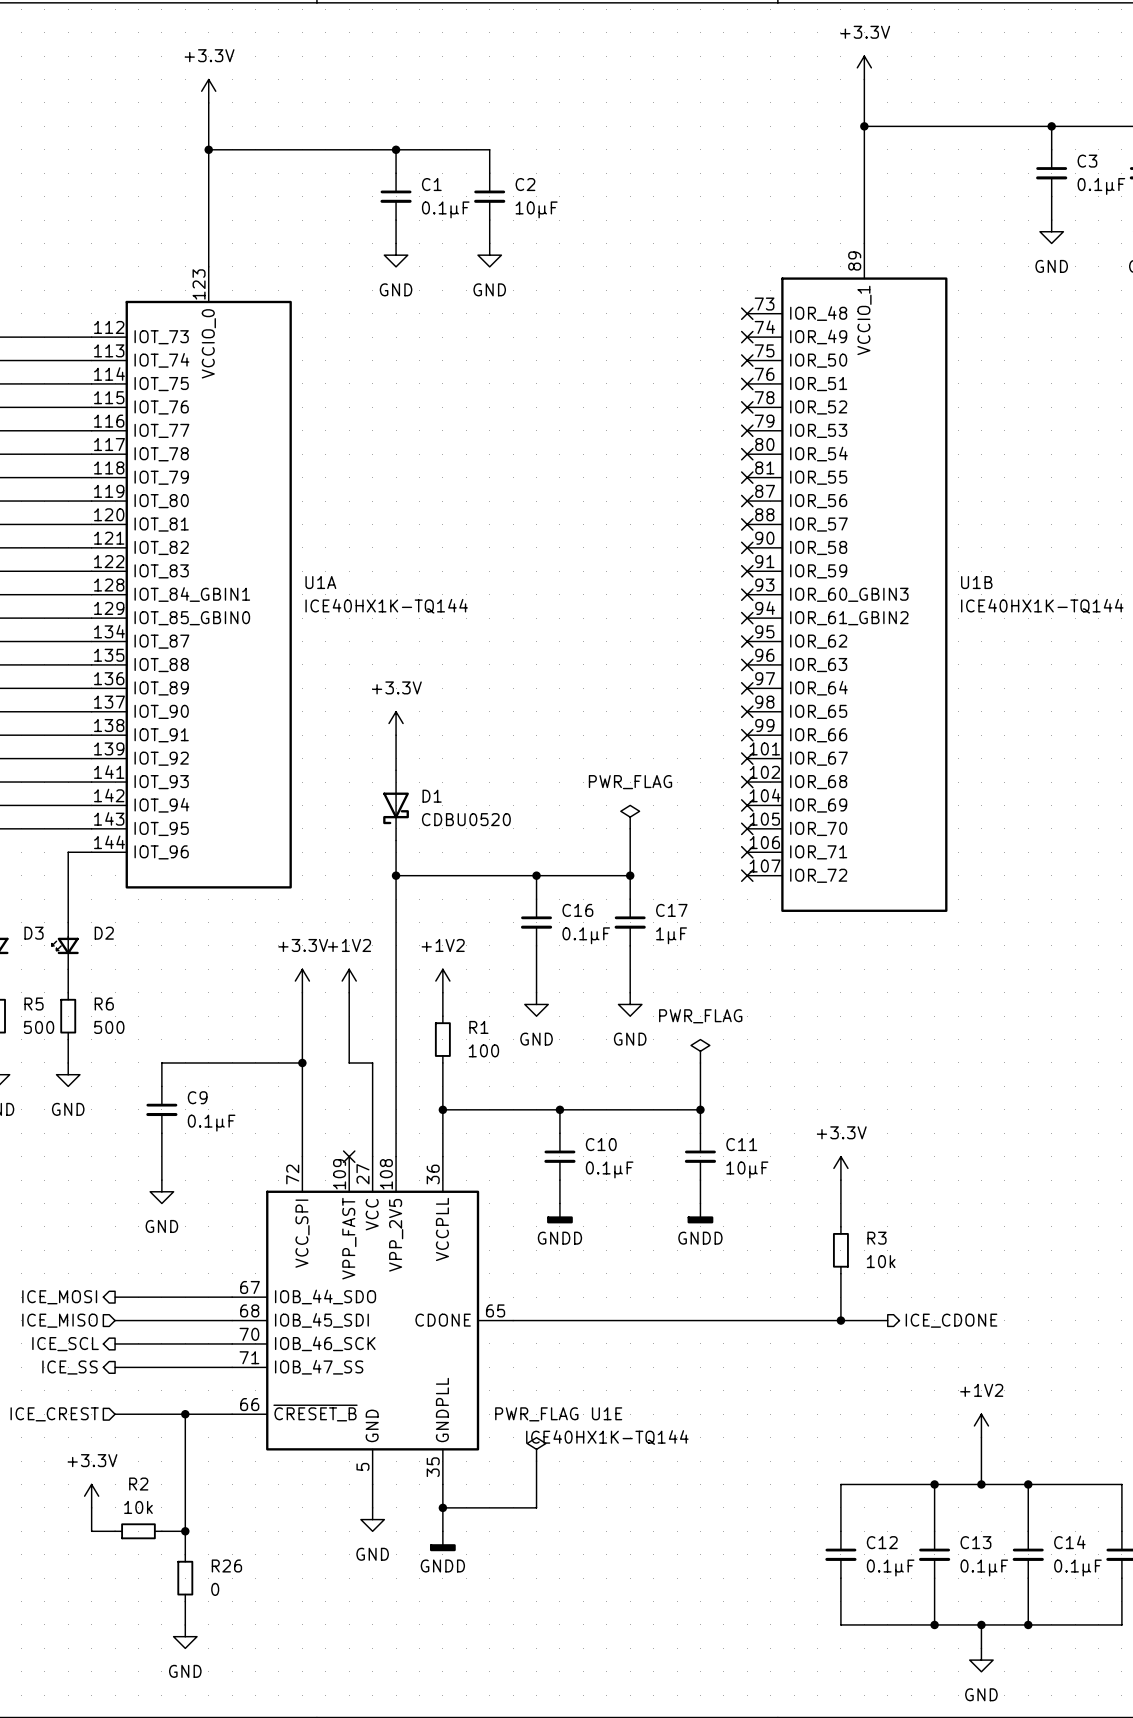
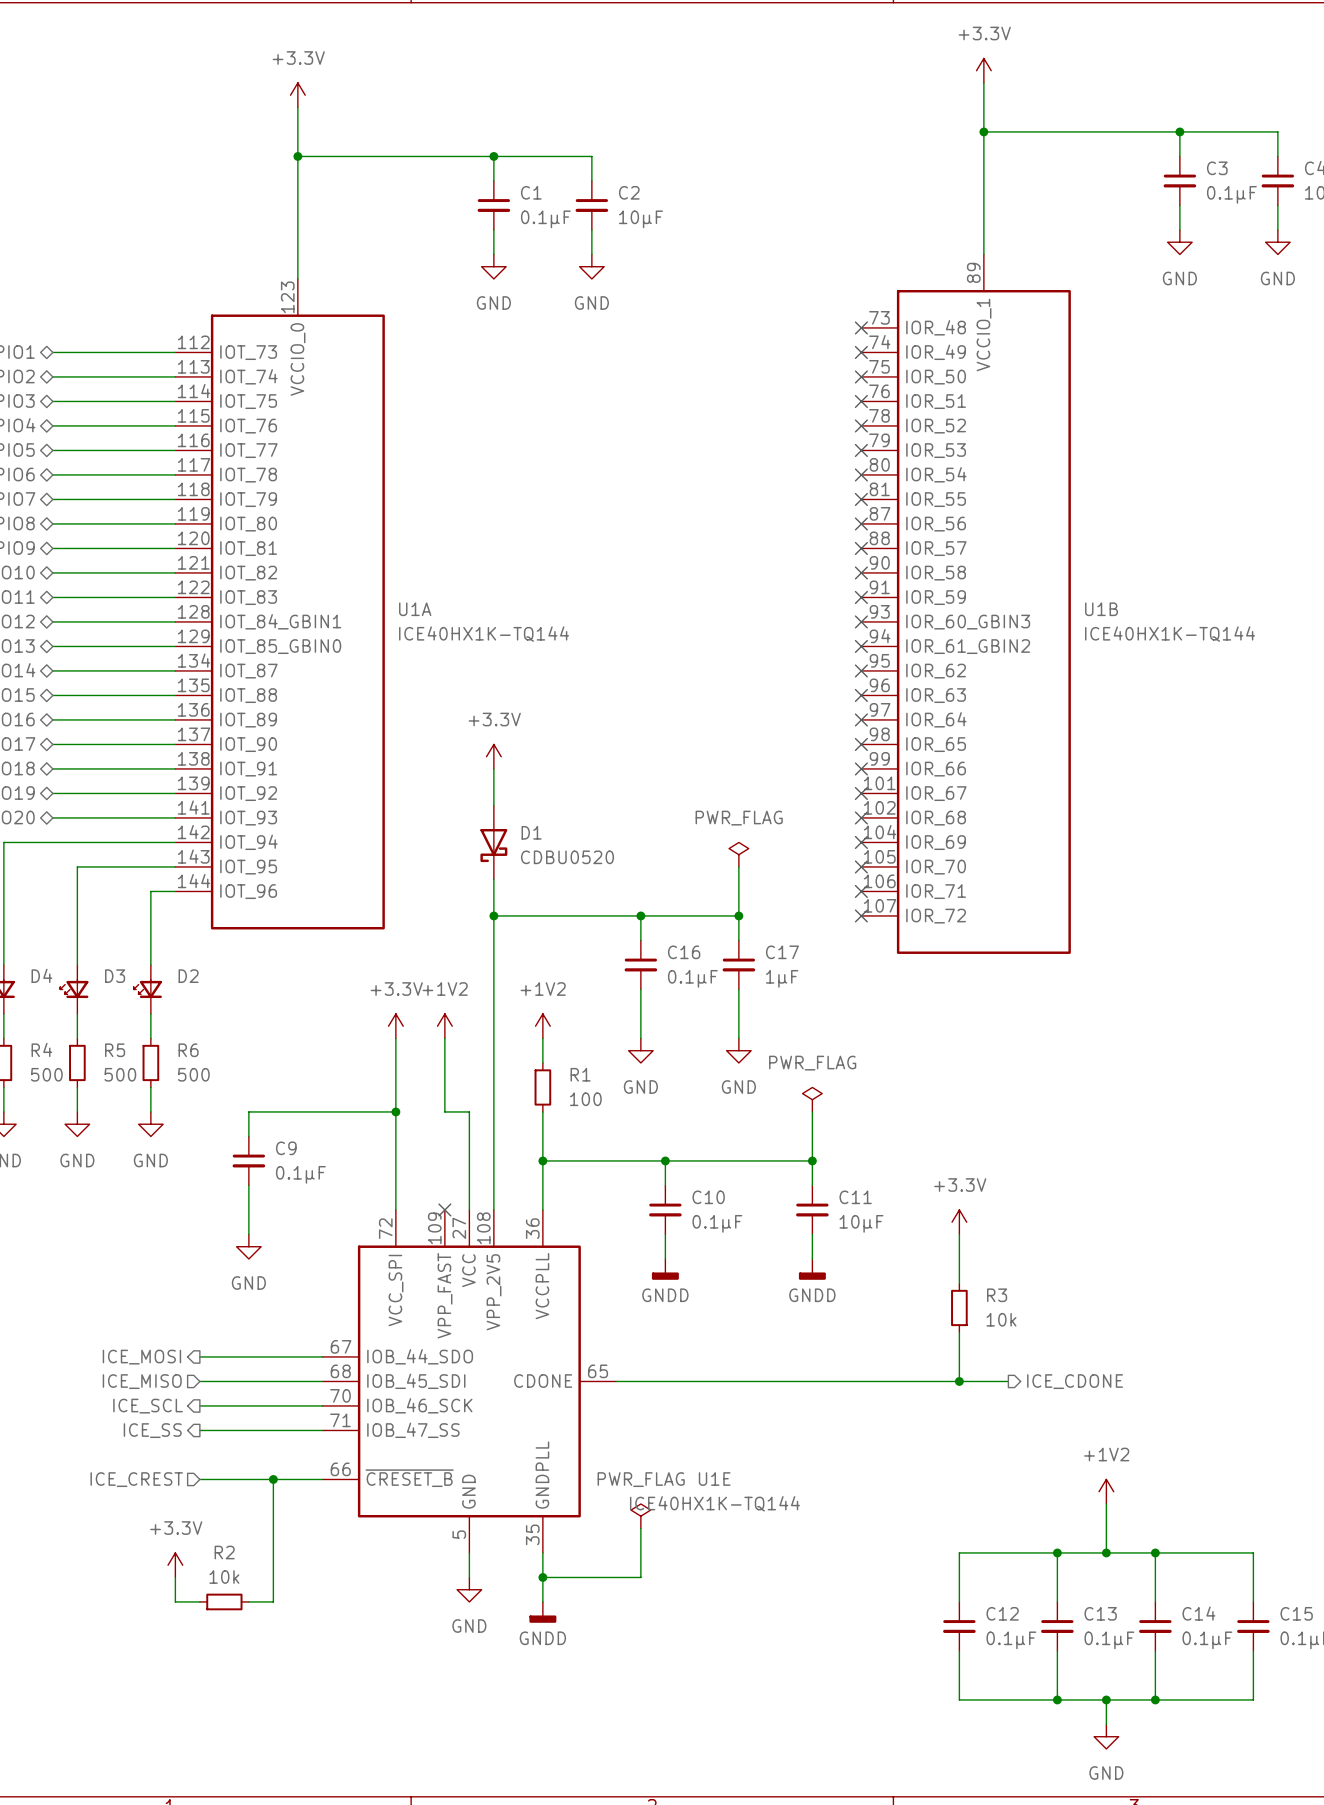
wire: (185, 1531) (185, 1554) -> none
junction: (185, 1531) -> none
R26: 0 (185, 1578) -> none
wire: (185, 1601) (185, 1624) -> none
power symbol: GND (185, 1636) -> none

